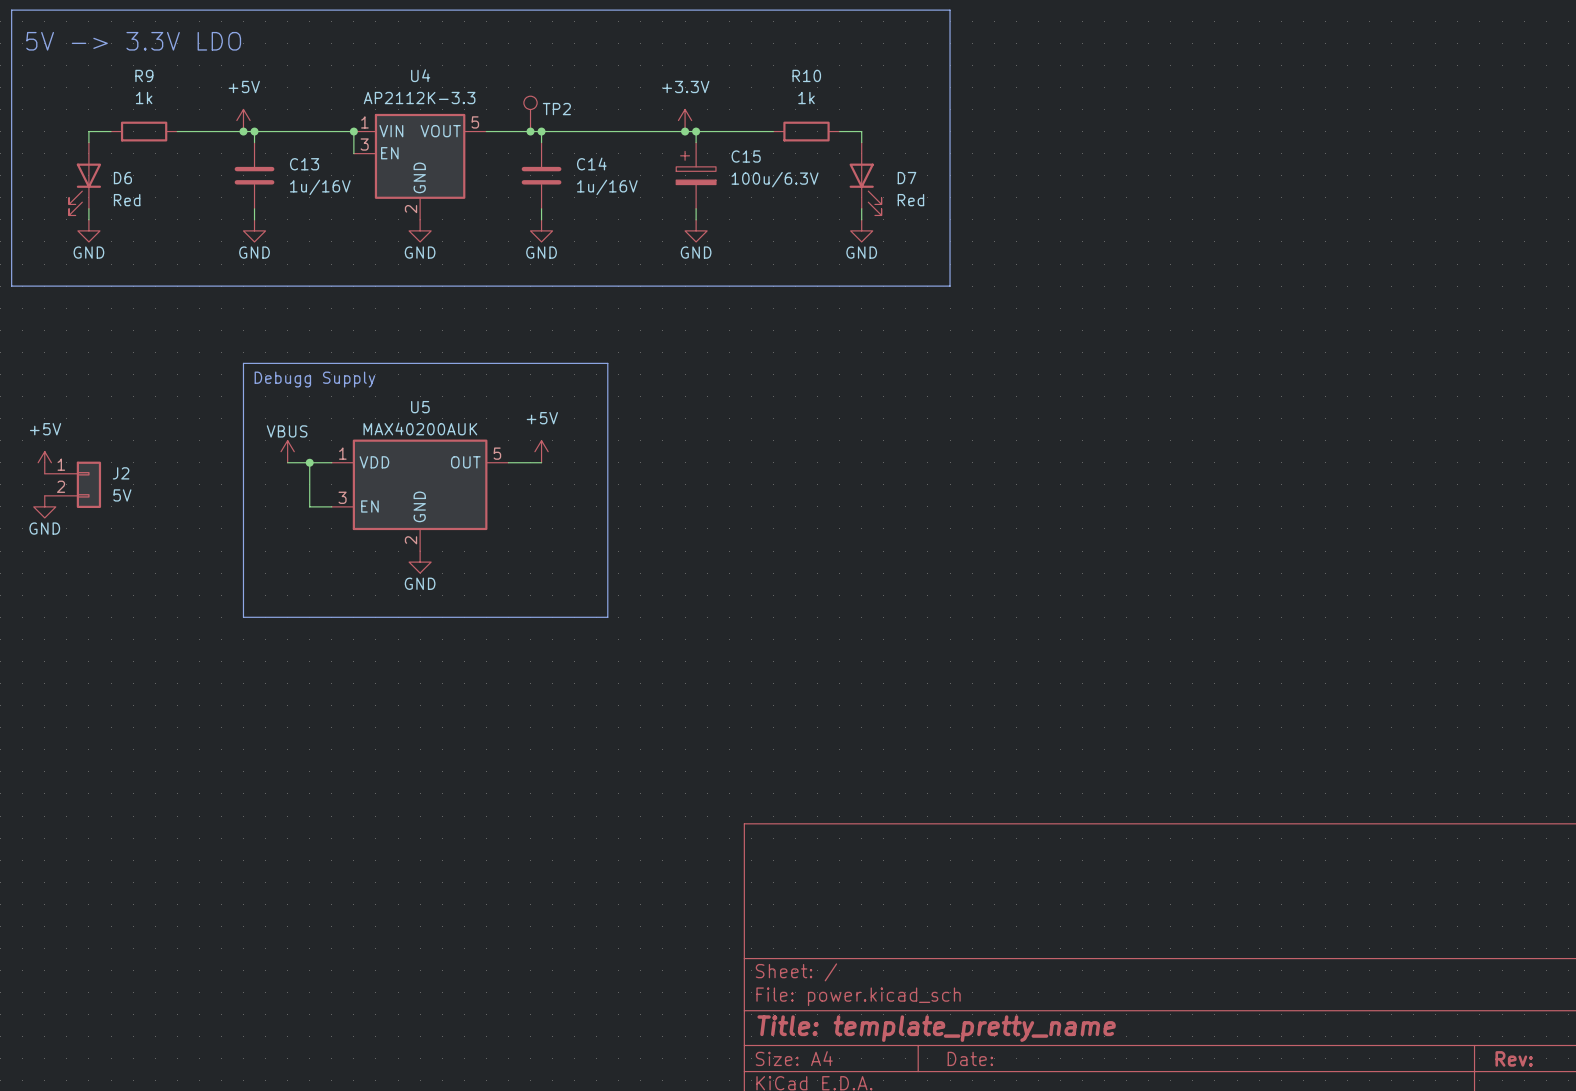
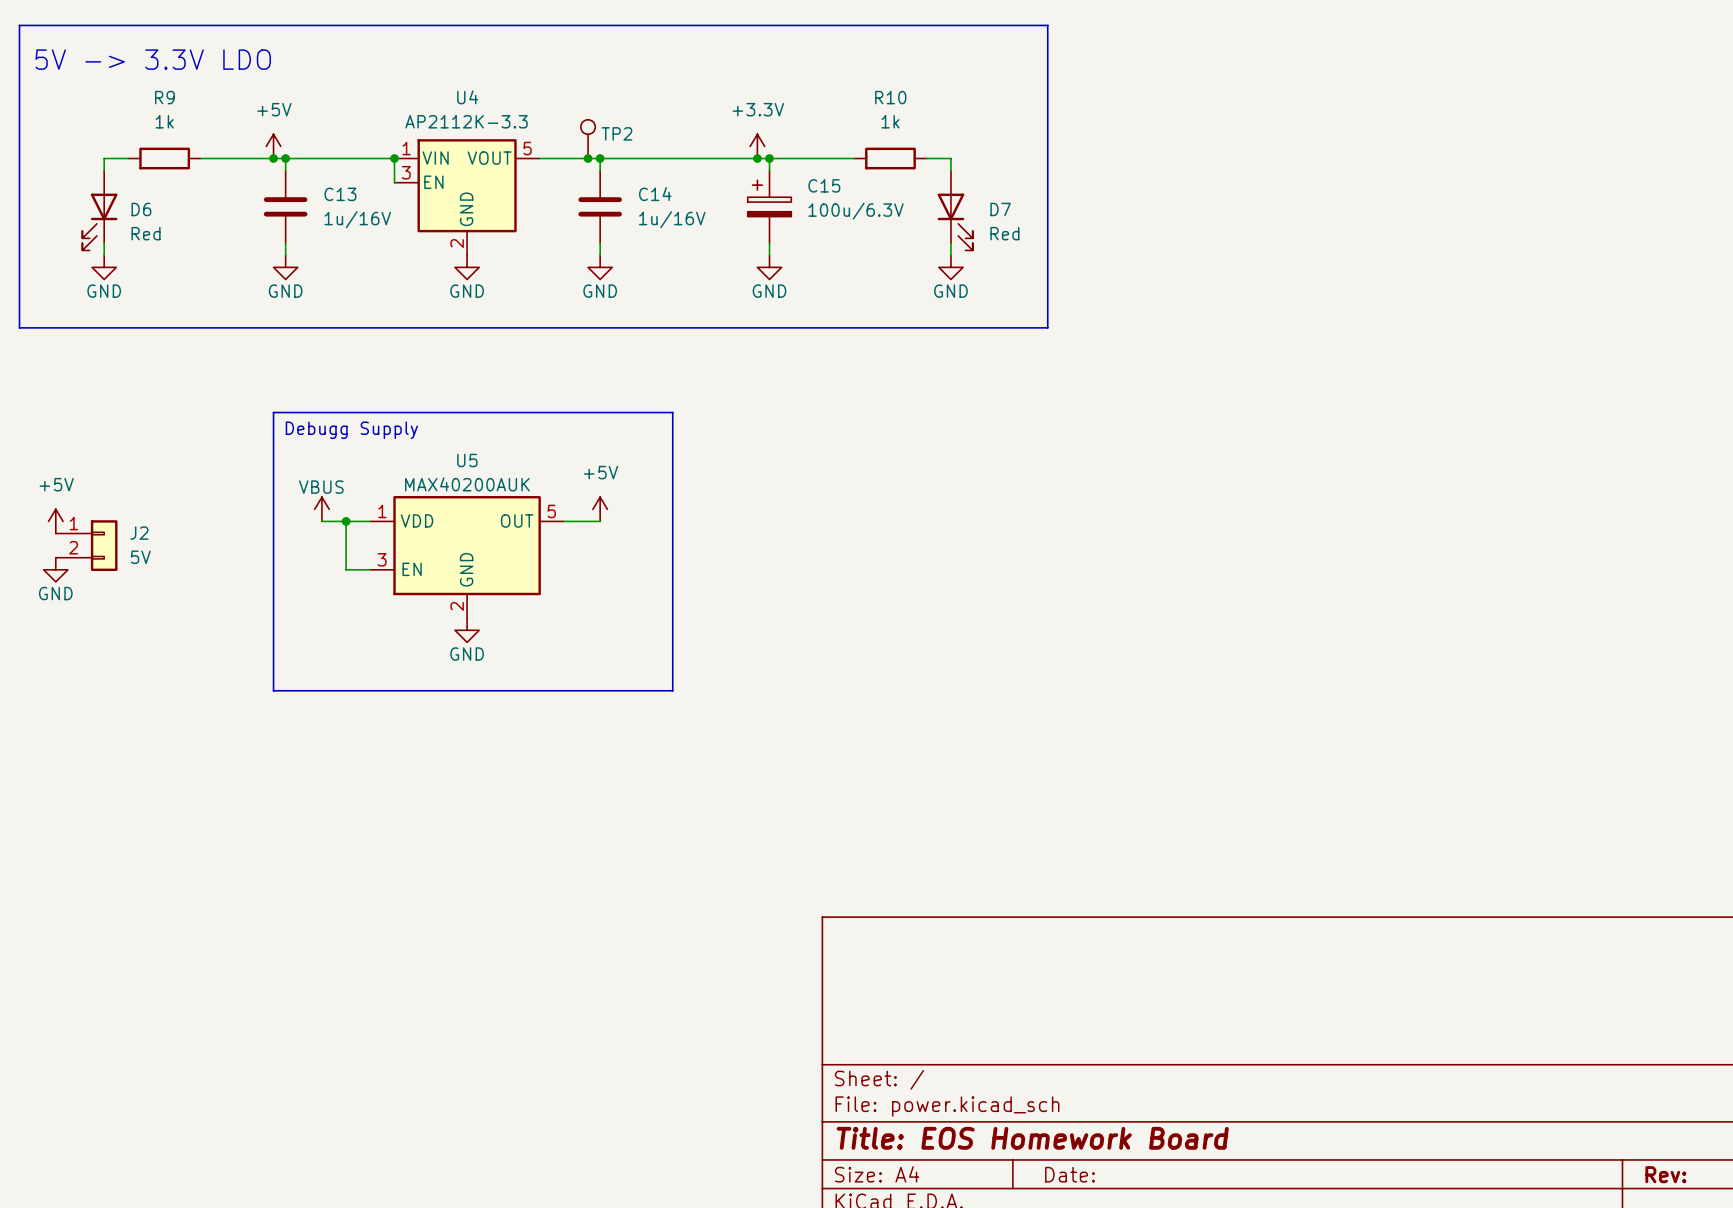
title block: Title: template_pretty_name (936, 1028) -> Title: EOS Homework Board (1032, 1138)

